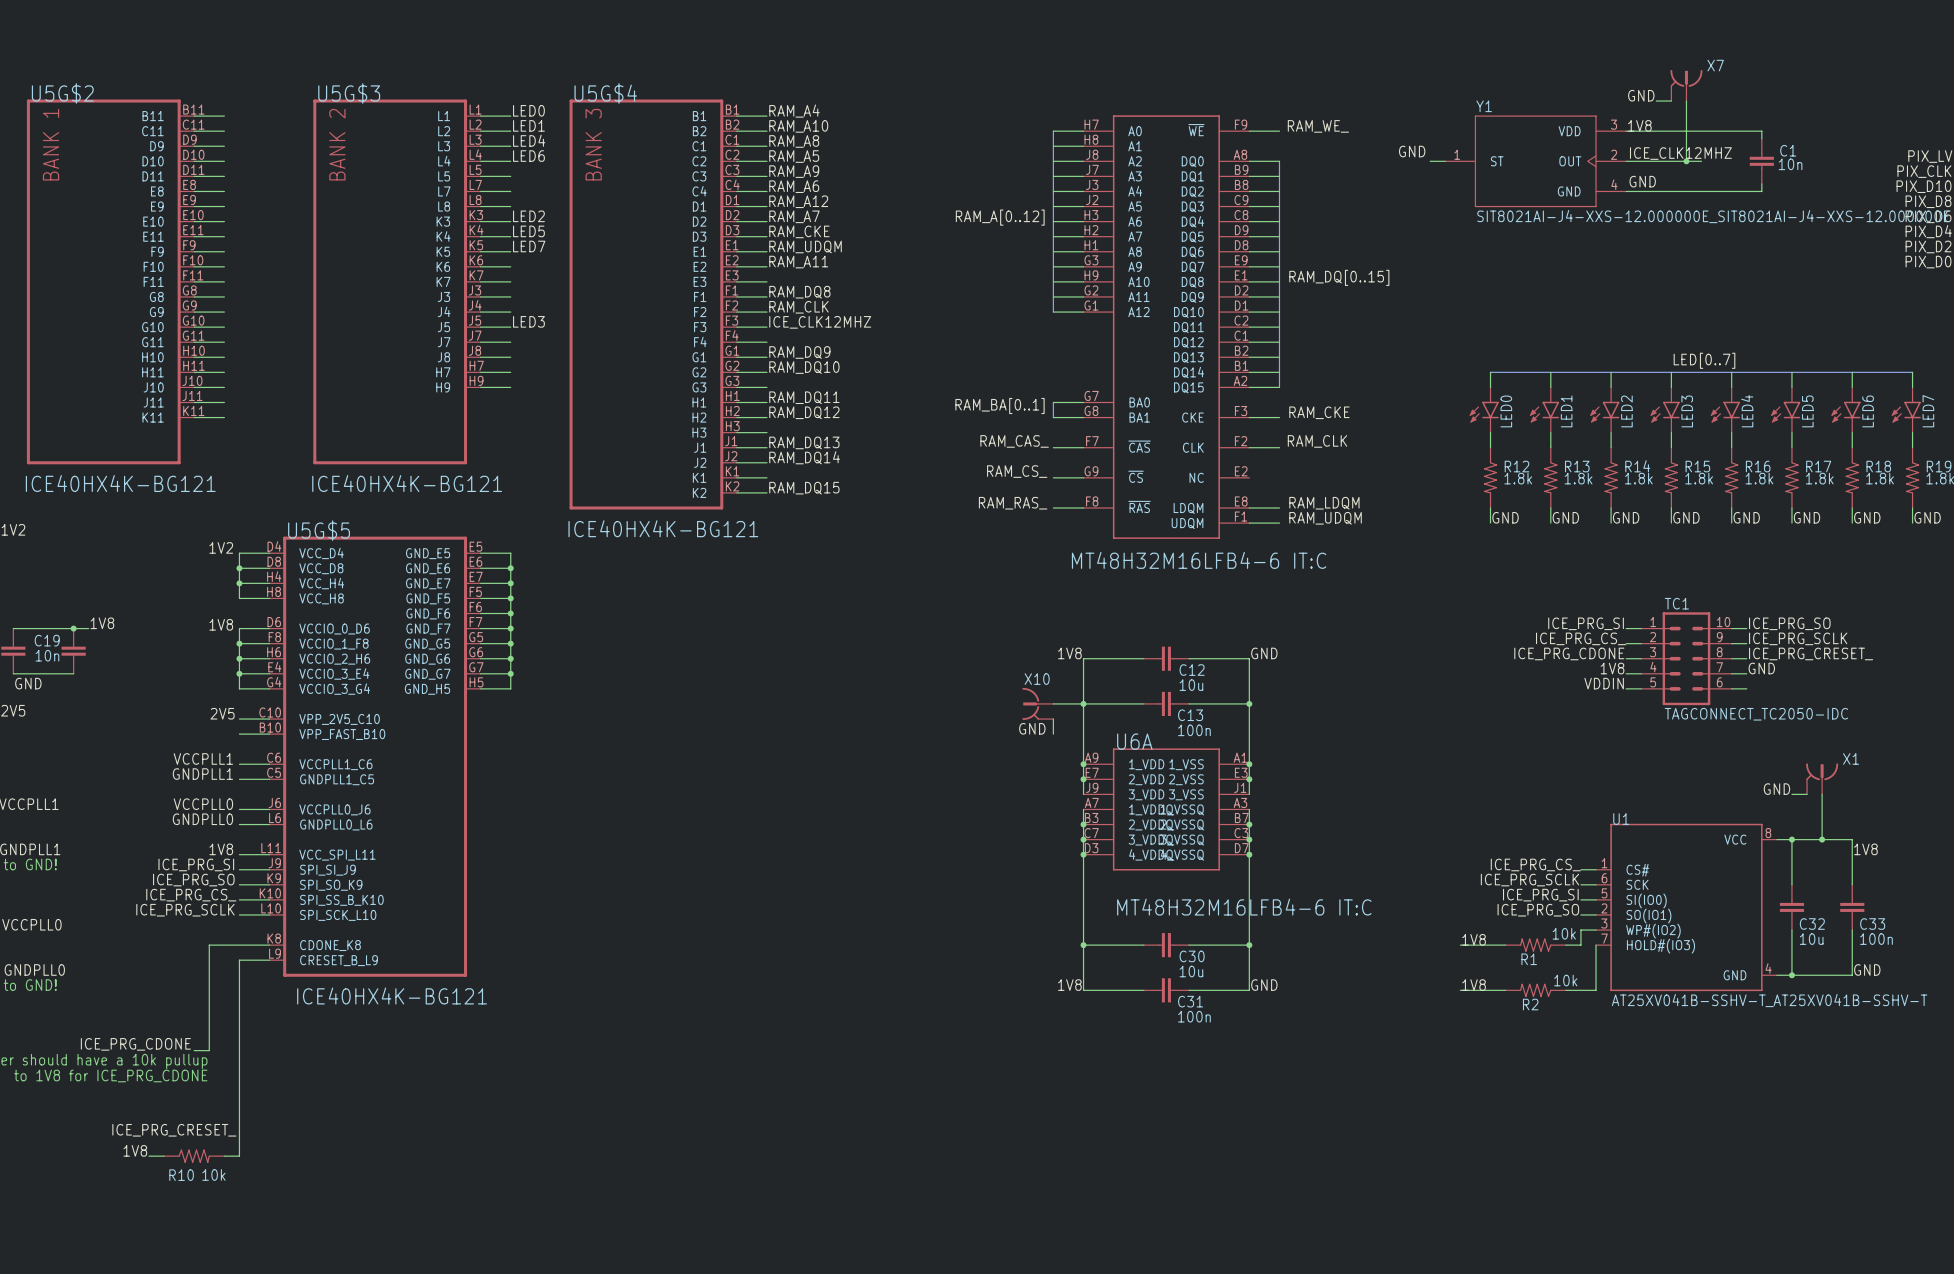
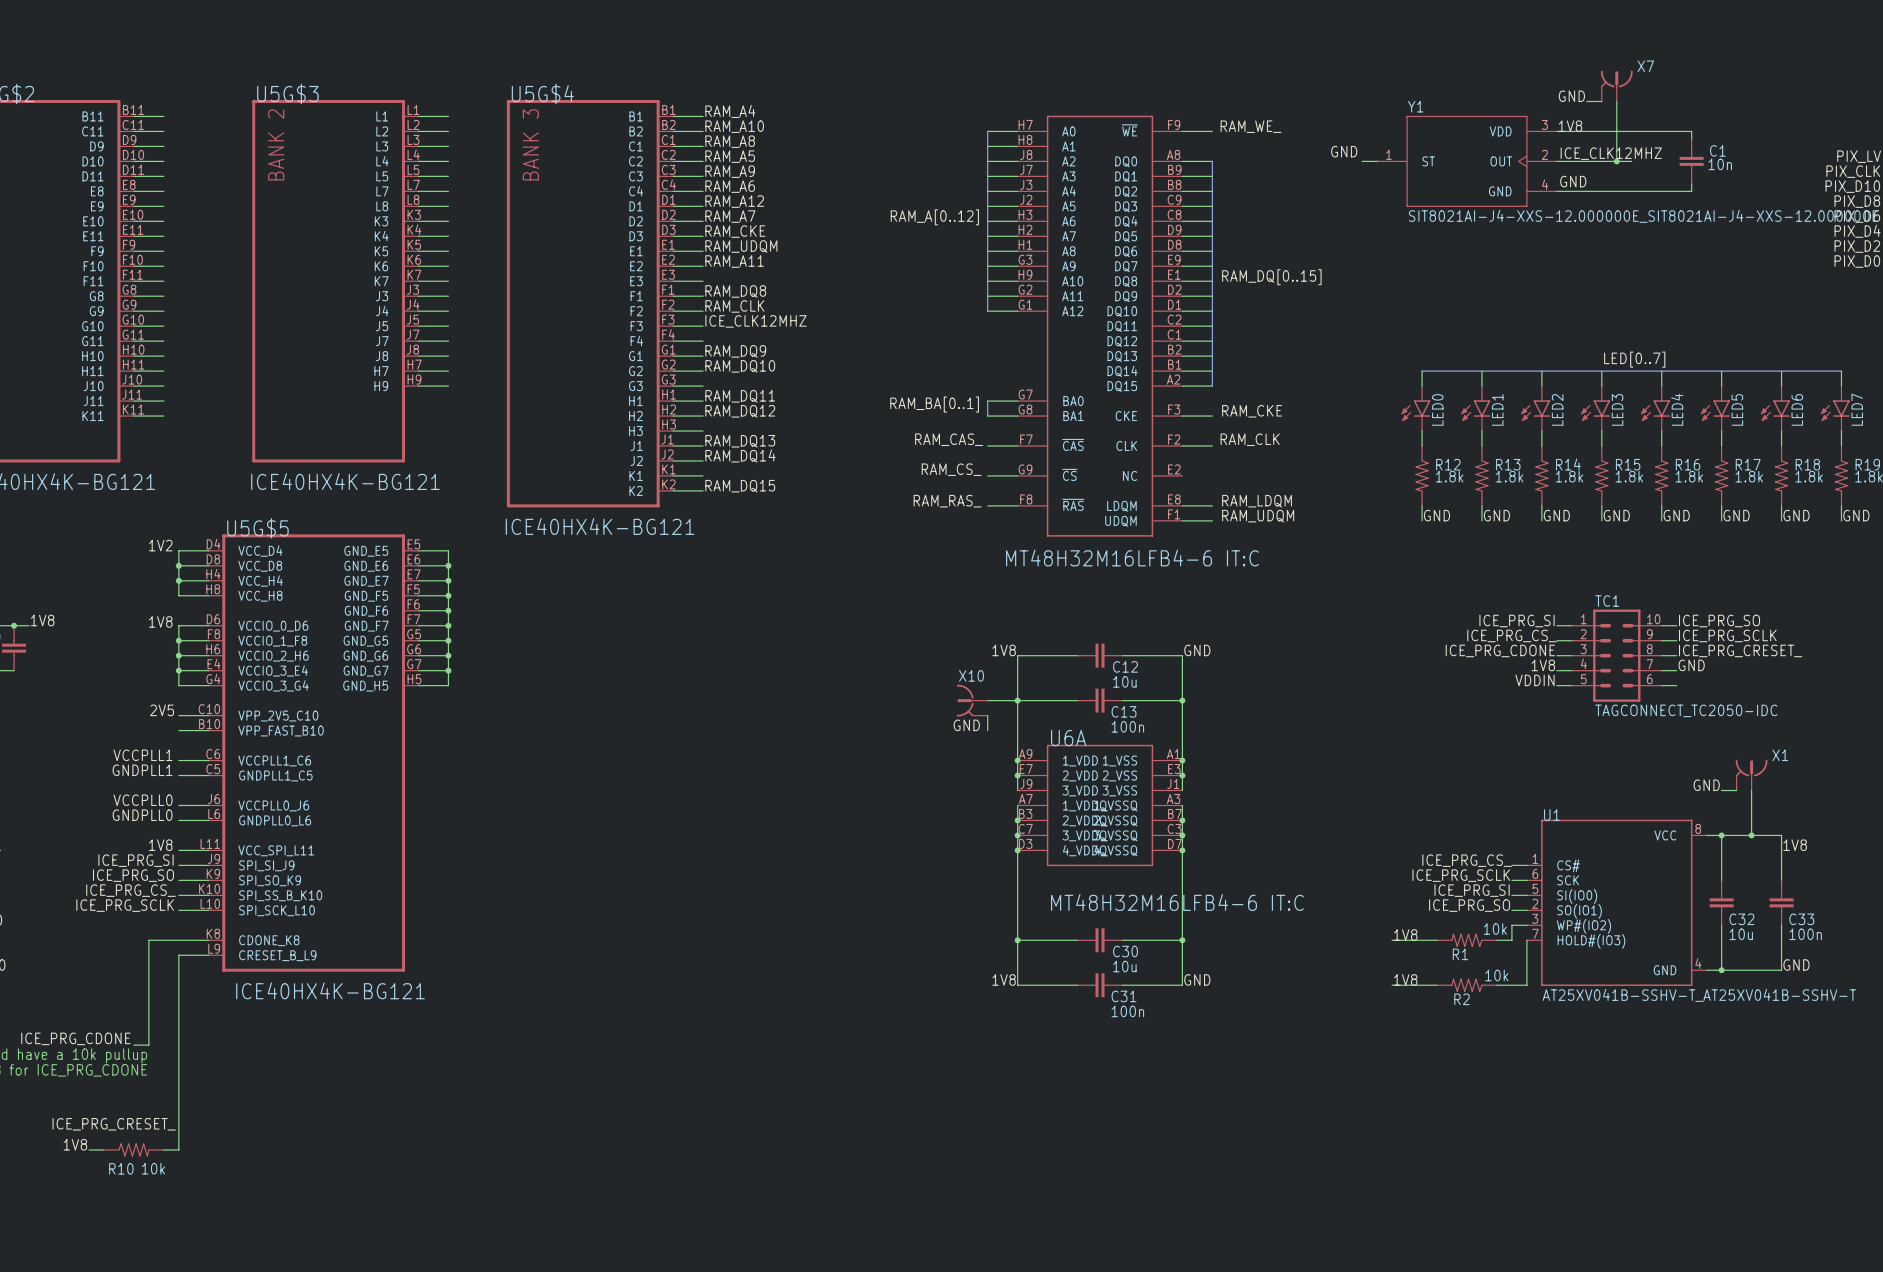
label: LED0 (528, 110) -> none
label: LED1 (528, 125) -> none
label: LED4 (529, 140) -> none
label: LED6 (528, 156) -> none
label: LED2 (528, 216) -> none
label: LED5 (528, 231) -> none
label: LED7 (529, 246) -> none
label: LED3 (528, 321) -> none

